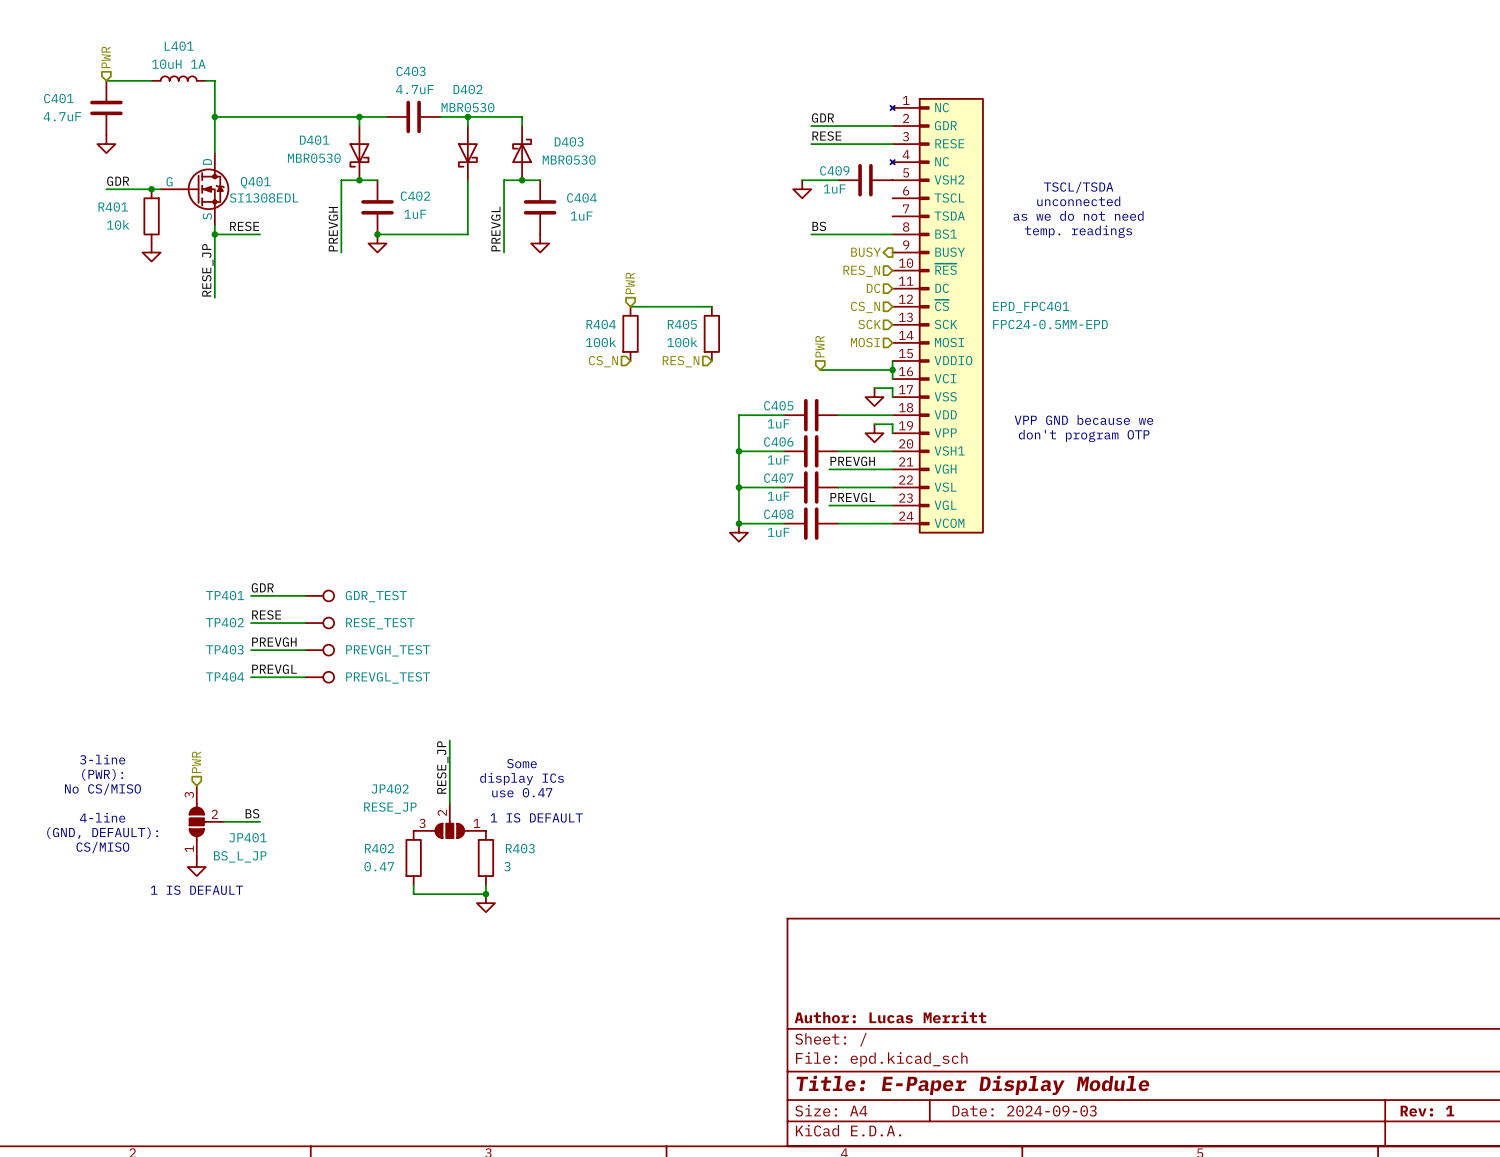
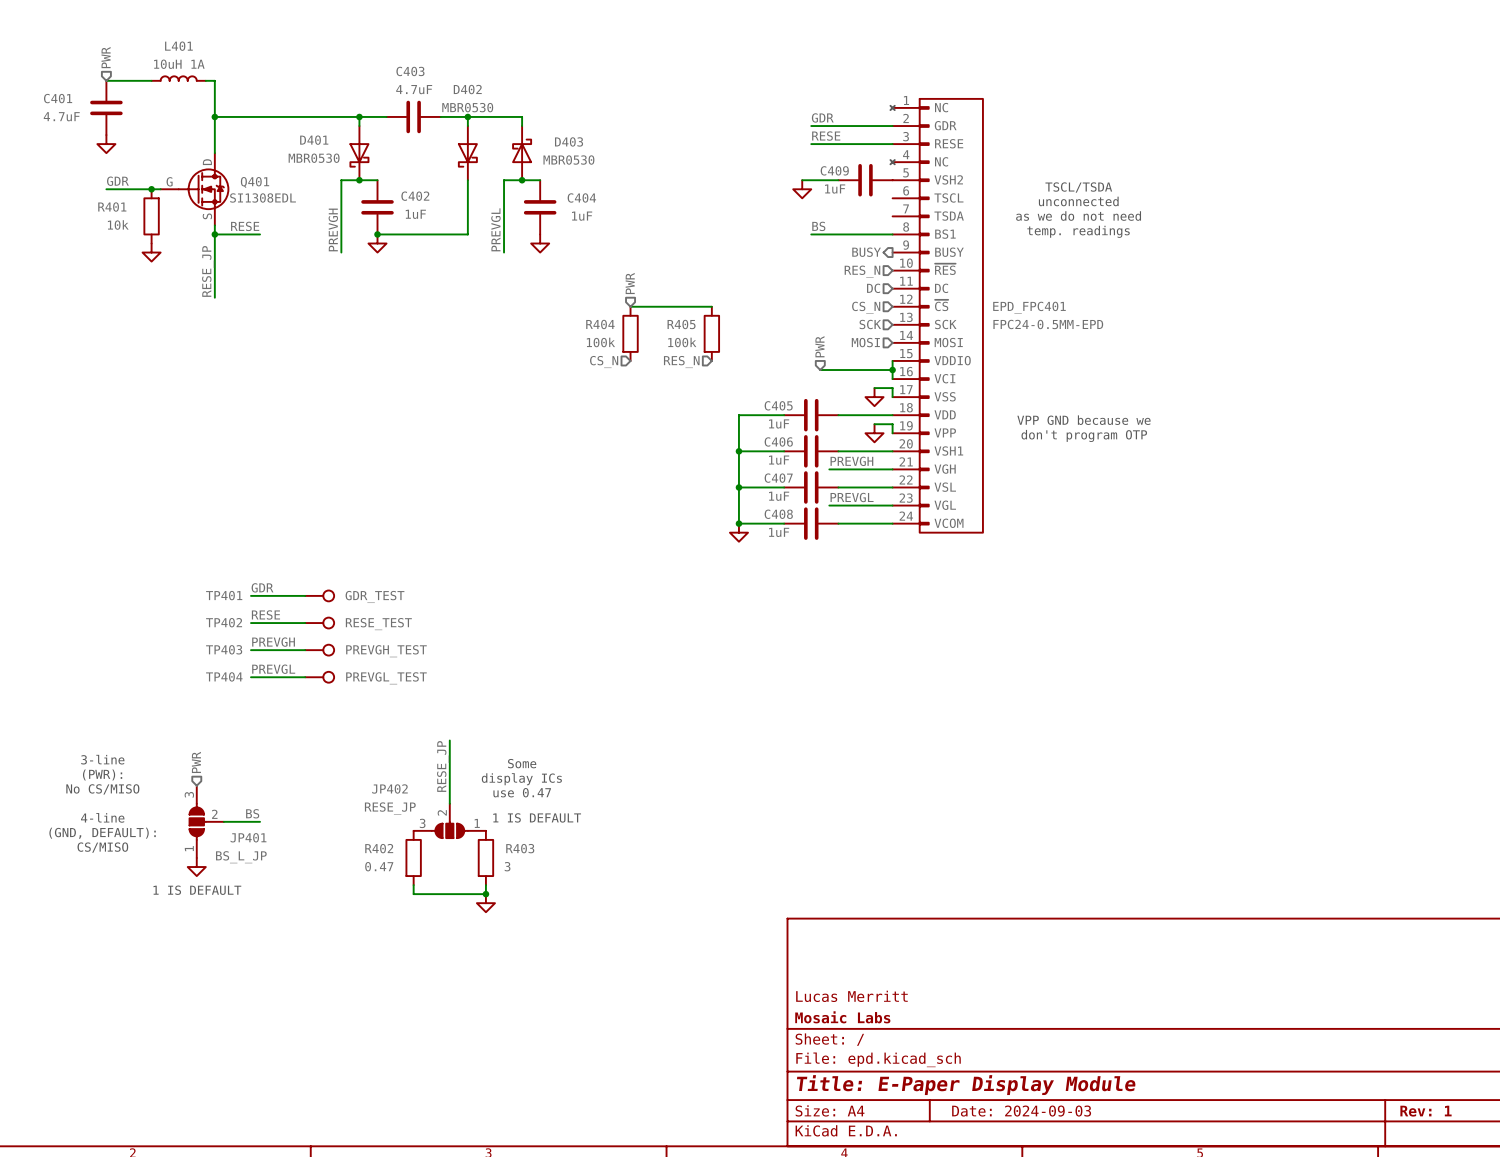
title block: none -> Lucas Merritt (851, 996)
title block: Author: Lucas Merritt (890, 1017) -> Mosaic Labs (842, 1017)

